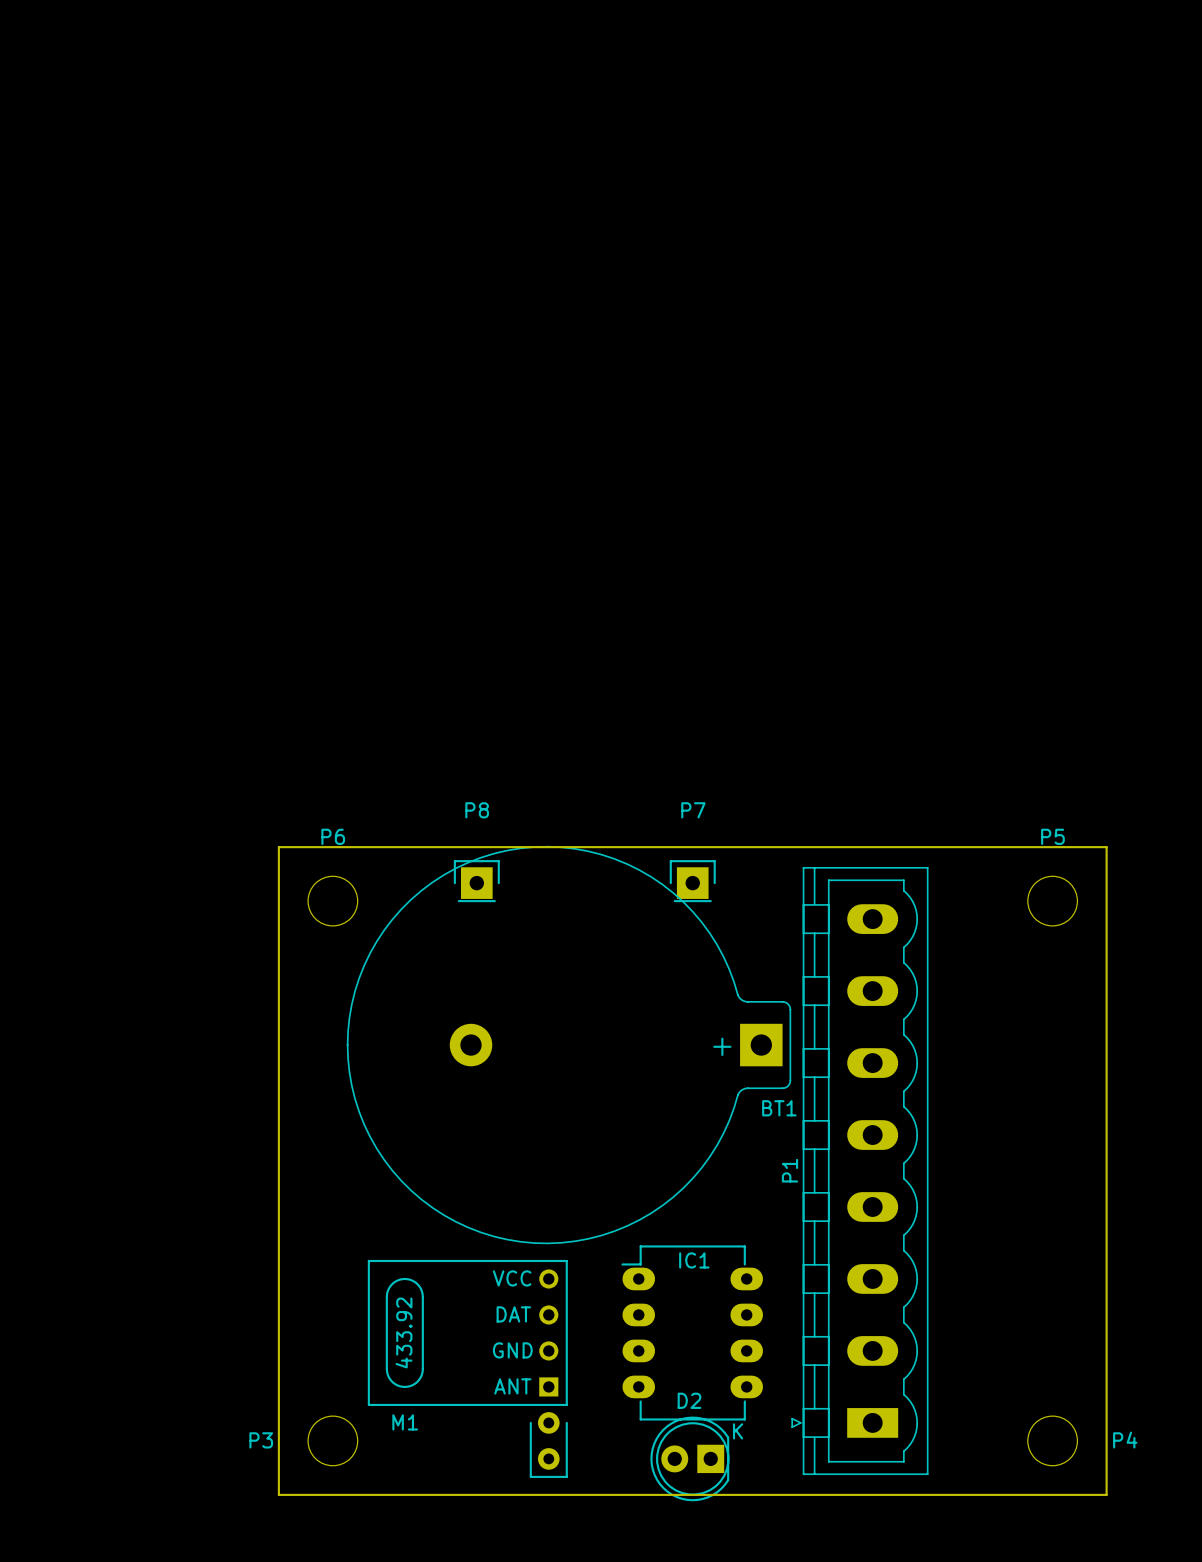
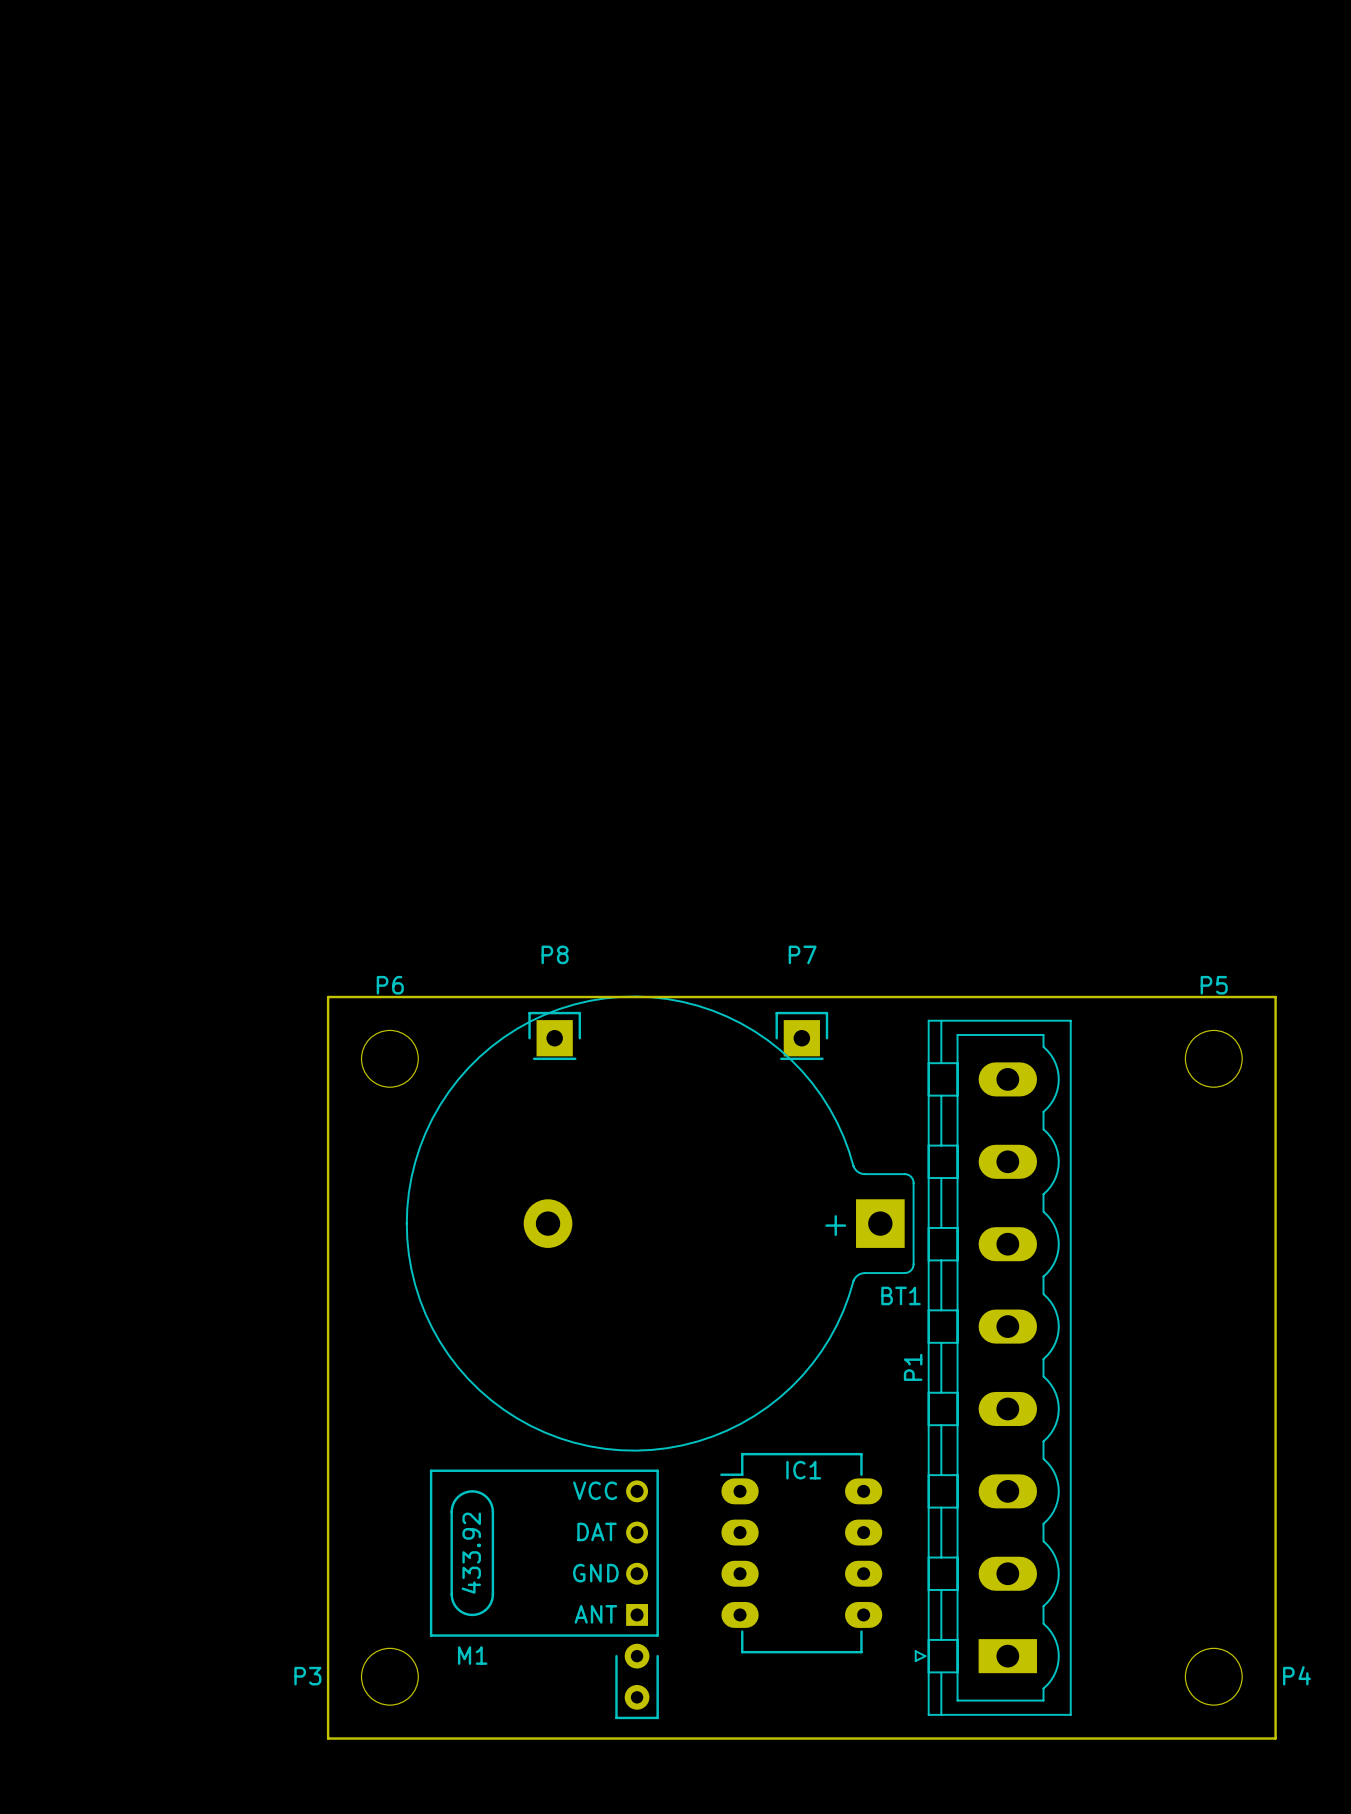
D2: (689, 1458) -> none

